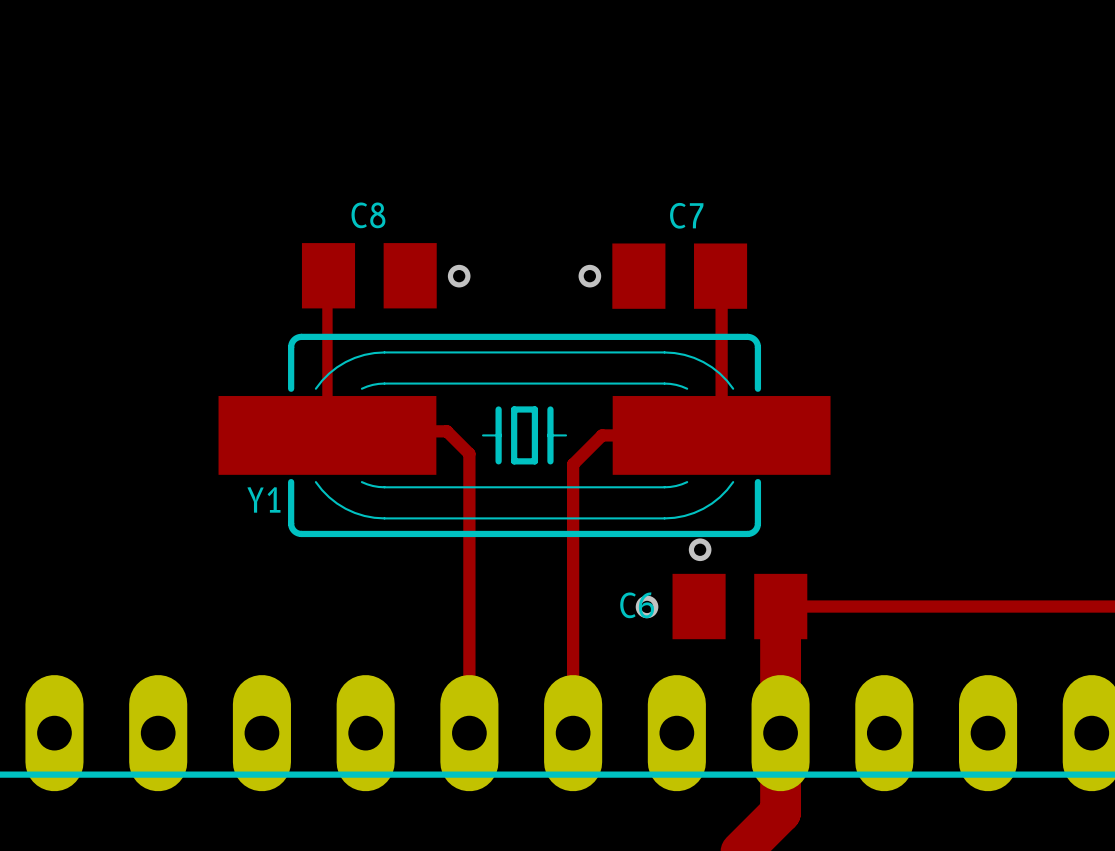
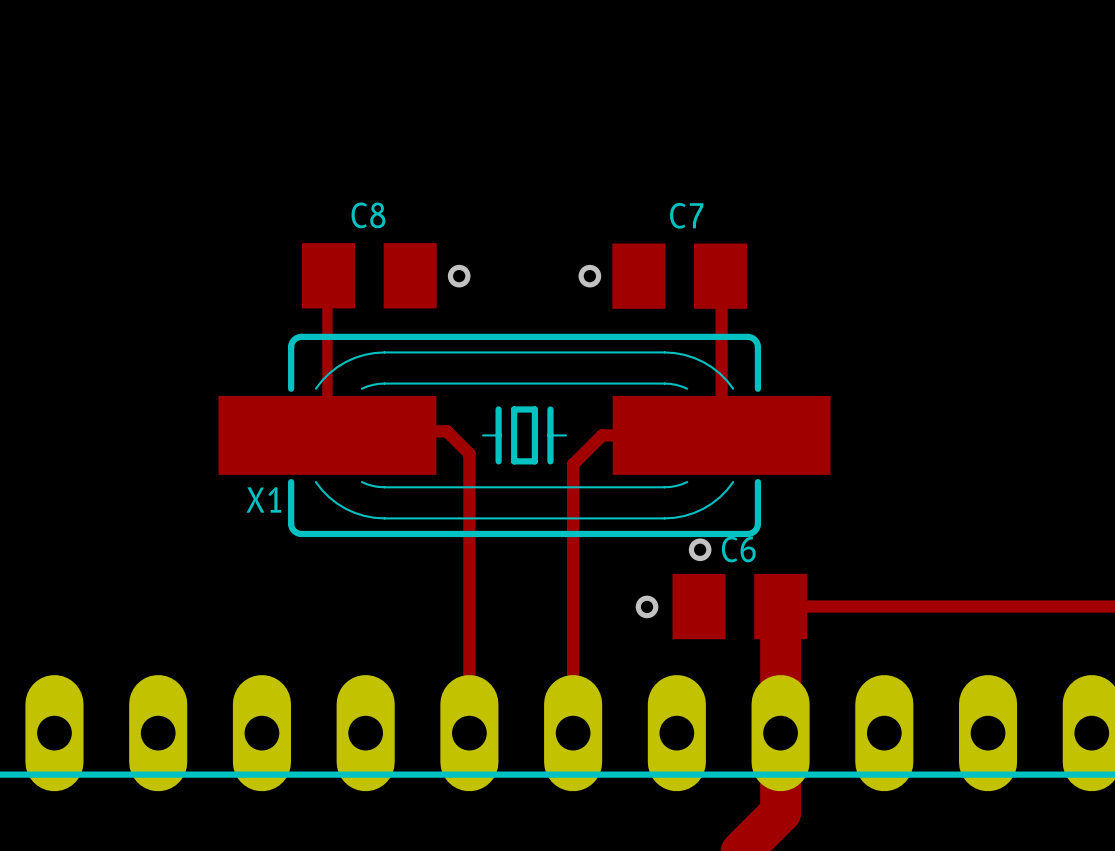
Y1 name: Y1 (263, 499) -> X1 (263, 499)
C6 name position: C6 (637, 605) -> C6 (738, 549)

